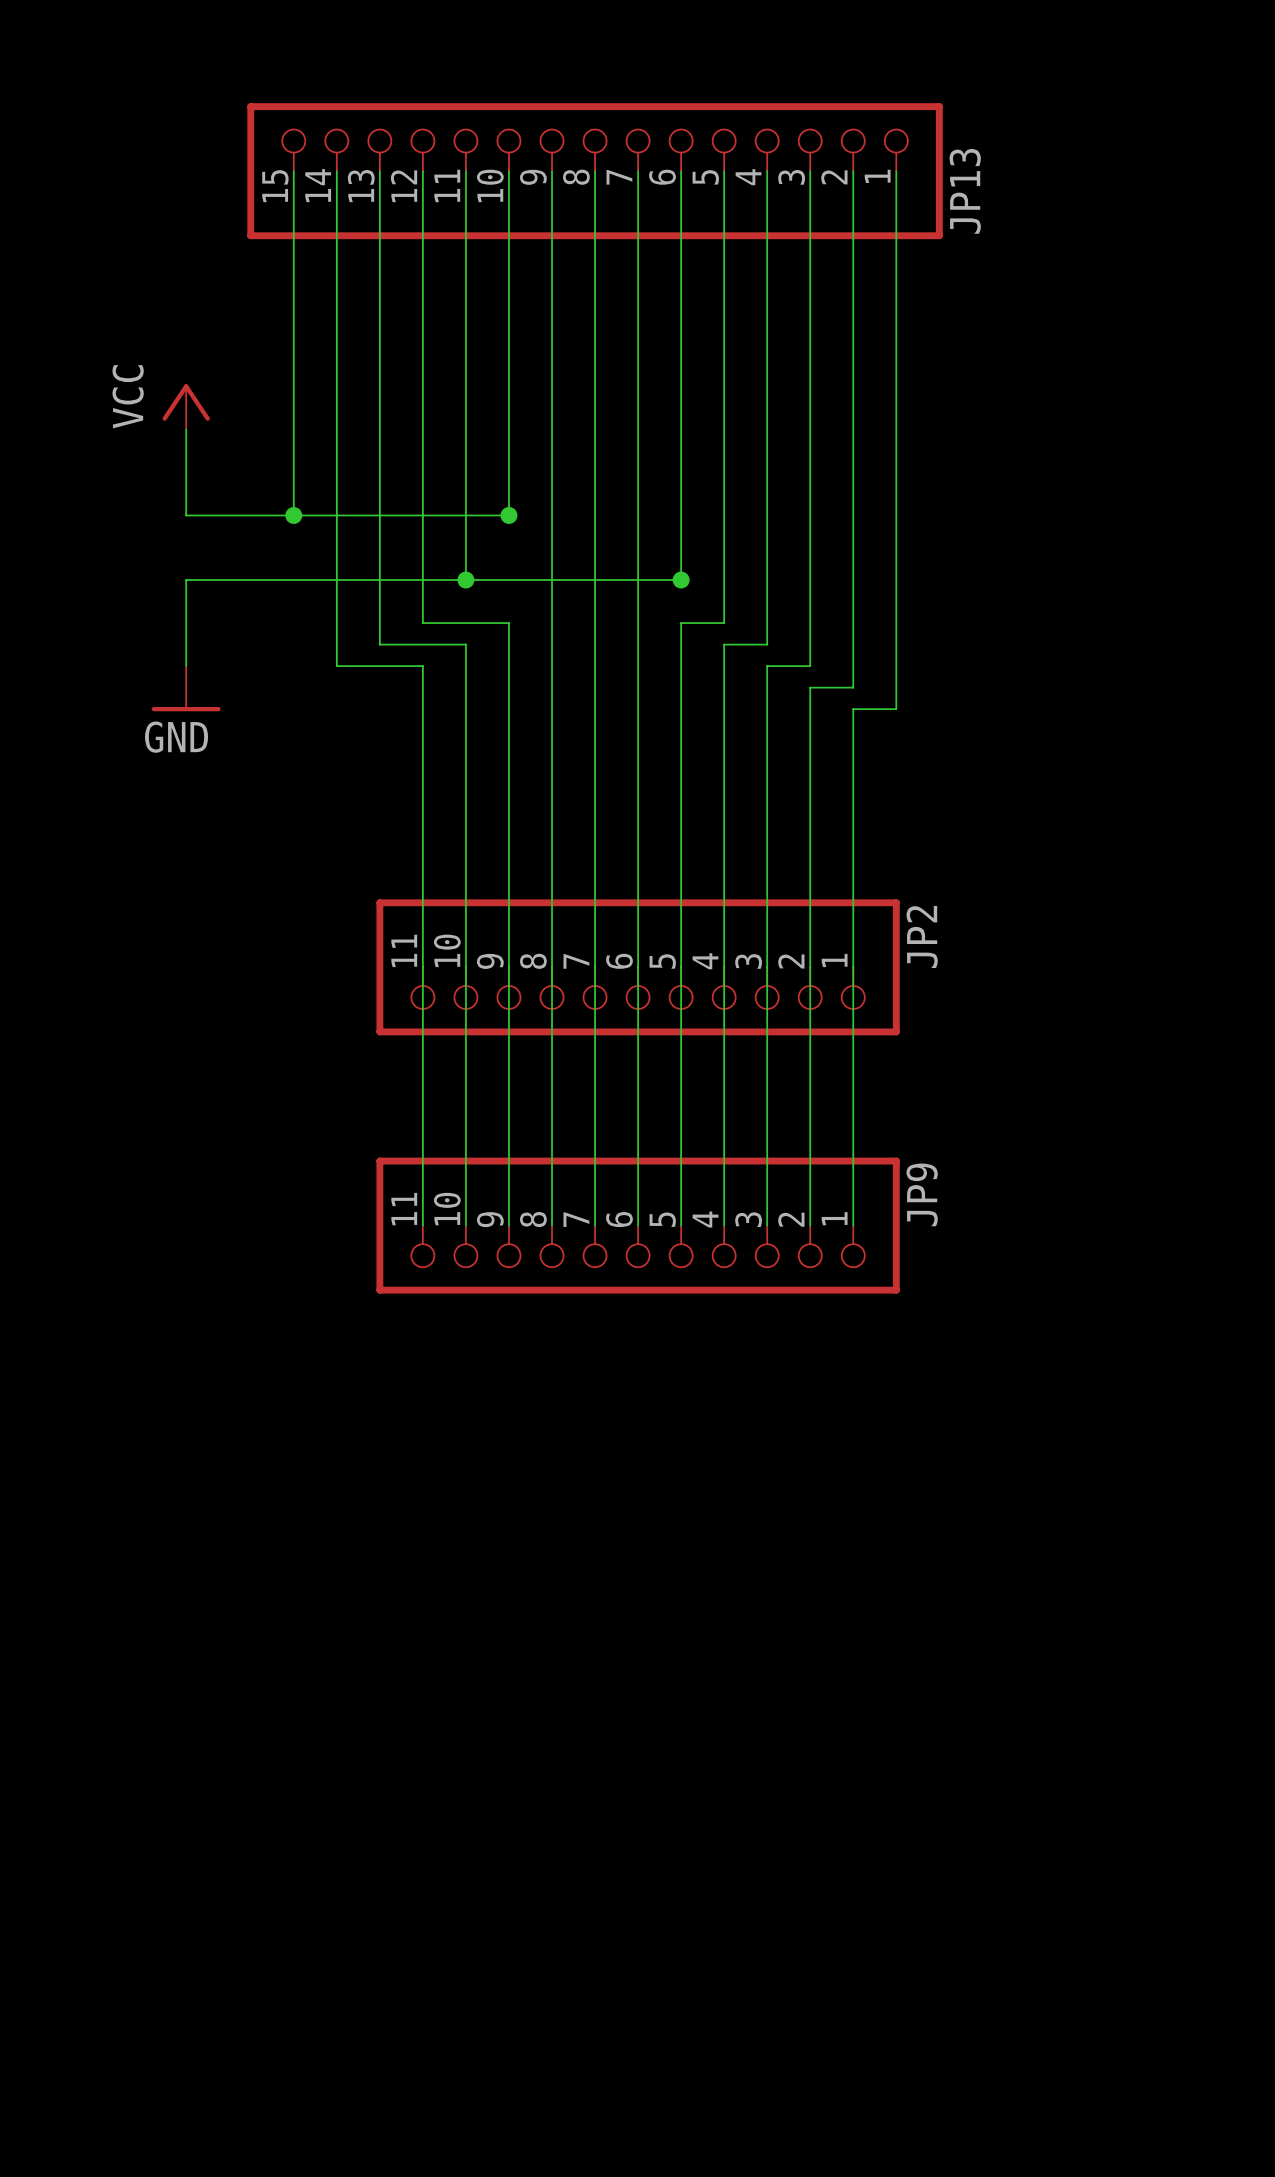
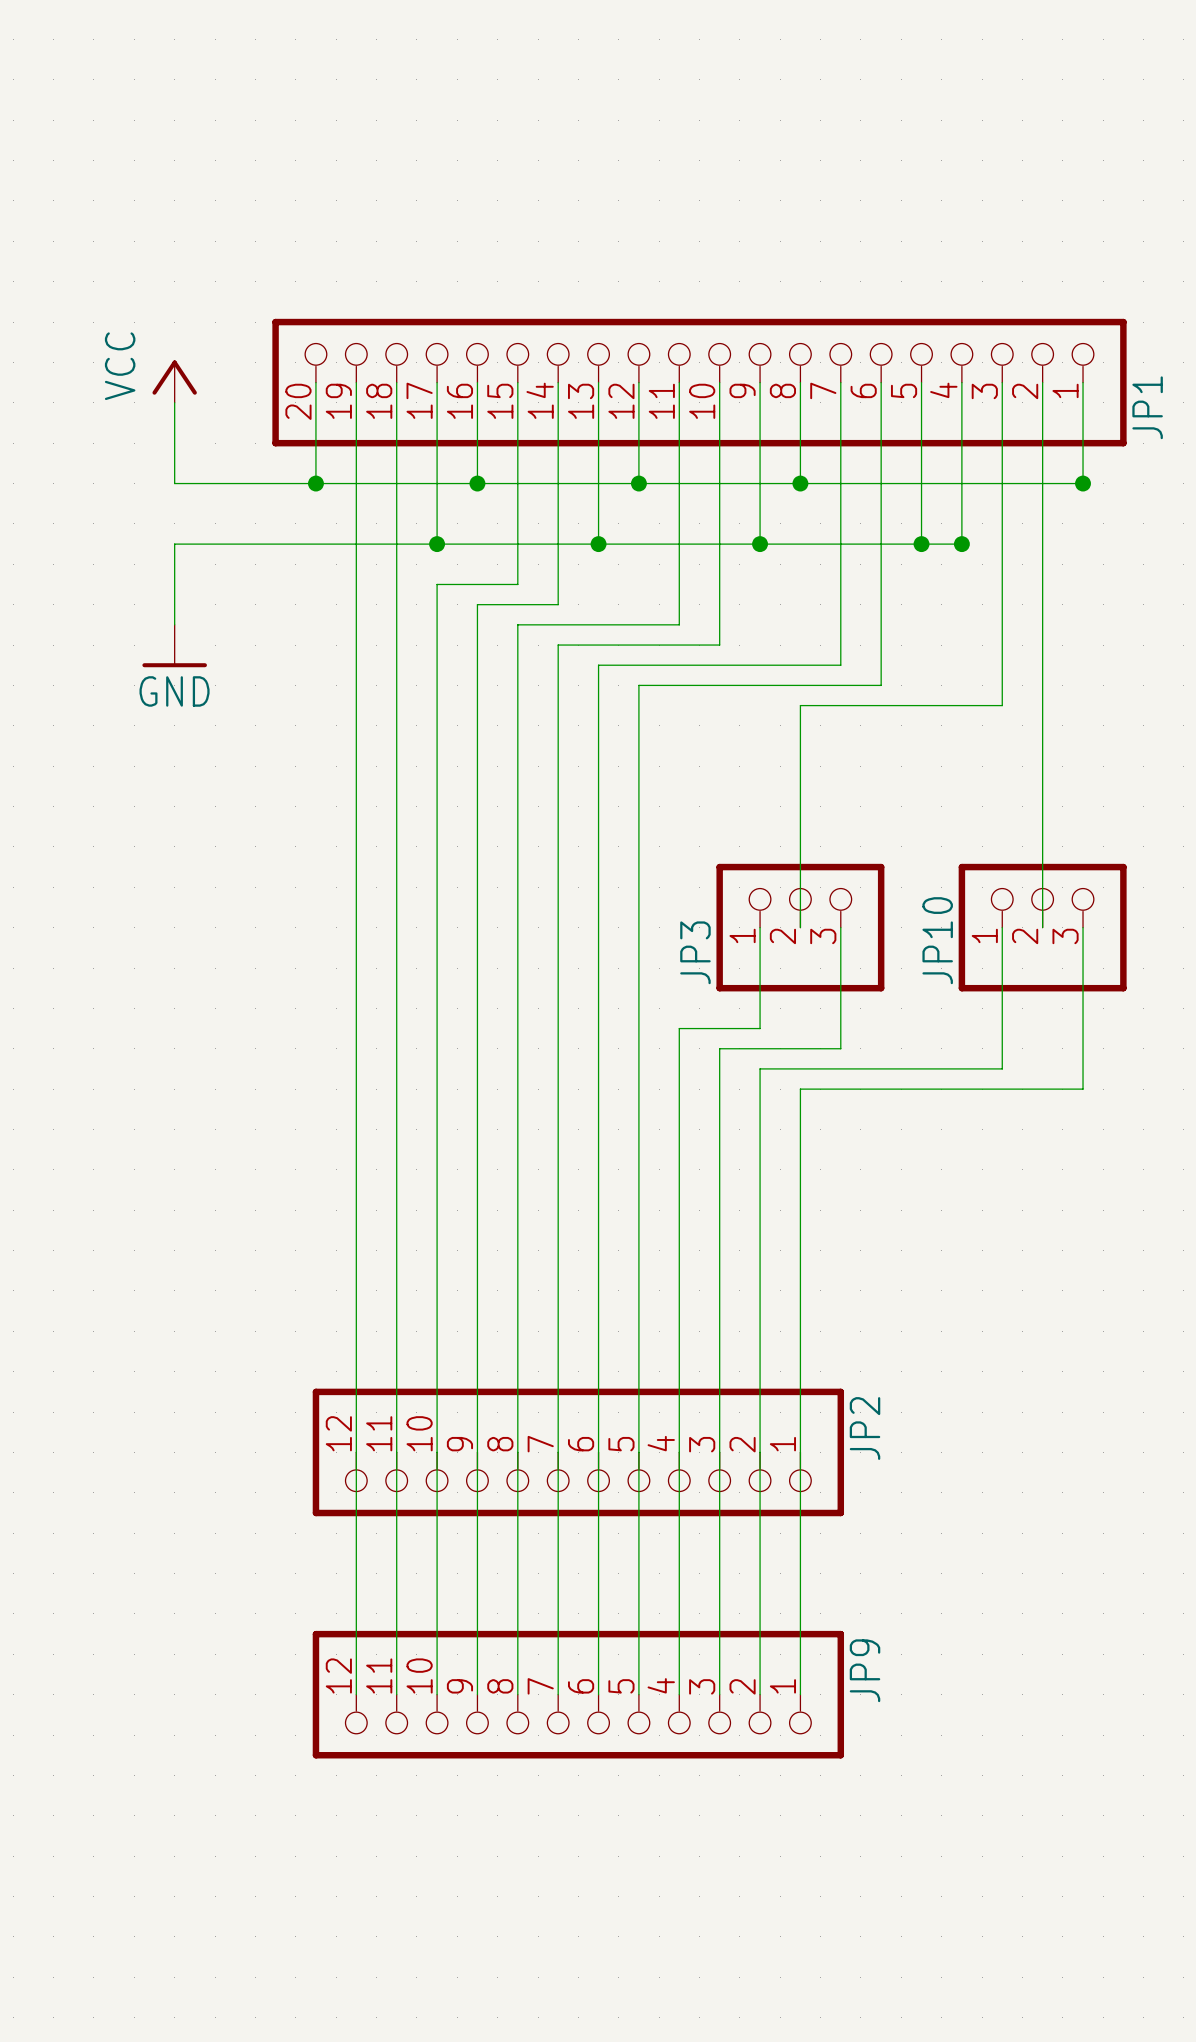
wire: (293, 171) (293, 515) -> none
wire: (336, 171) (336, 407) -> none
wire: (379, 171) (379, 407) -> none
wire: (422, 171) (422, 407) -> none
wire: (465, 171) (465, 407) -> none
wire: (508, 171) (508, 407) -> none
wire: (552, 171) (552, 407) -> none
wire: (595, 171) (595, 407) -> none
JP13: (595, 171) -> none
wire: (638, 171) (638, 407) -> none
wire: (681, 171) (681, 407) -> none
wire: (724, 171) (724, 407) -> none
wire: (767, 171) (767, 407) -> none
wire: (810, 171) (810, 407) -> none
wire: (853, 171) (853, 407) -> none
wire: (896, 171) (896, 407) -> none
JP1: none -> (699, 382)
wire: none -> (881, 382) (881, 685) (638, 685)
wire: none -> (921, 382) (921, 544)
wire: none -> (1002, 382) (1002, 705) (800, 705)
wire: none -> (1042, 382) (1042, 927)
wire: none -> (1083, 382) (1083, 483) (477, 483)
junction position: (293, 515) -> (315, 483)
wire: (336, 515) (336, 666) (422, 666) -> (396, 584) (396, 624)
wire: (681, 515) (681, 580) -> (961, 382) (961, 544) (638, 544)
junction: none -> (638, 483)
wire: (853, 515) (853, 687) (810, 687) (810, 988) -> none
junction: none -> (800, 483)
junction: none -> (1083, 483)
wire: (638, 580) (638, 709) -> none
junction: none -> (598, 544)
junction: (681, 580) -> none
wire: (810, 580) (810, 666) (767, 666) -> none
junction: none -> (760, 544)
junction: none -> (921, 544)
junction: none -> (961, 544)
wire: (422, 623) (465, 623) -> (437, 604) (437, 584)
wire: (508, 623) (508, 644) -> (477, 584) (517, 584)
wire: (552, 623) (552, 666) -> (679, 624) (517, 624)
wire: (724, 623) (681, 623) (681, 730) -> (679, 584) (679, 604)
wire: (379, 644) (465, 644) -> (356, 604) (356, 1694)
wire: (595, 644) (595, 687) -> (558, 604) (477, 604)
wire: (724, 644) (767, 644) -> (719, 624) (719, 604)
wire: (724, 666) (724, 1096) -> none
wire: none -> (558, 645) (719, 645)
wire: (767, 687) (767, 1117) -> (840, 927) (840, 1048) (719, 1048)
wire: (853, 709) (853, 752) -> (800, 665) (598, 665)
JP2 symbol: [376, 899, 900, 1036] -> [312, 1388, 845, 1517]
wire: (853, 988) (853, 1161) -> (1083, 927) (1083, 1089) (800, 1089)
JP3: none -> (800, 927)
wire: none -> (1002, 927) (1002, 1068) (760, 1068)
JP10: none -> (1042, 927)
wire: (810, 1096) (810, 1139) -> (760, 1028) (679, 1028)
JP9 symbol: [376, 1157, 900, 1294] -> [312, 1630, 845, 1759]
wire: none -> (396, 1149) (396, 1694)
wire: none -> (437, 1149) (437, 1694)
wire: none -> (477, 1149) (477, 1694)
wire: none -> (517, 1149) (517, 1694)
wire: none -> (558, 1149) (558, 1694)
wire: none -> (598, 1149) (598, 1694)
wire: none -> (638, 1149) (638, 1694)
wire: none -> (679, 1149) (679, 1694)
wire: none -> (719, 1149) (719, 1694)
wire: none -> (760, 1149) (760, 1694)
wire: none -> (800, 1149) (800, 1694)

